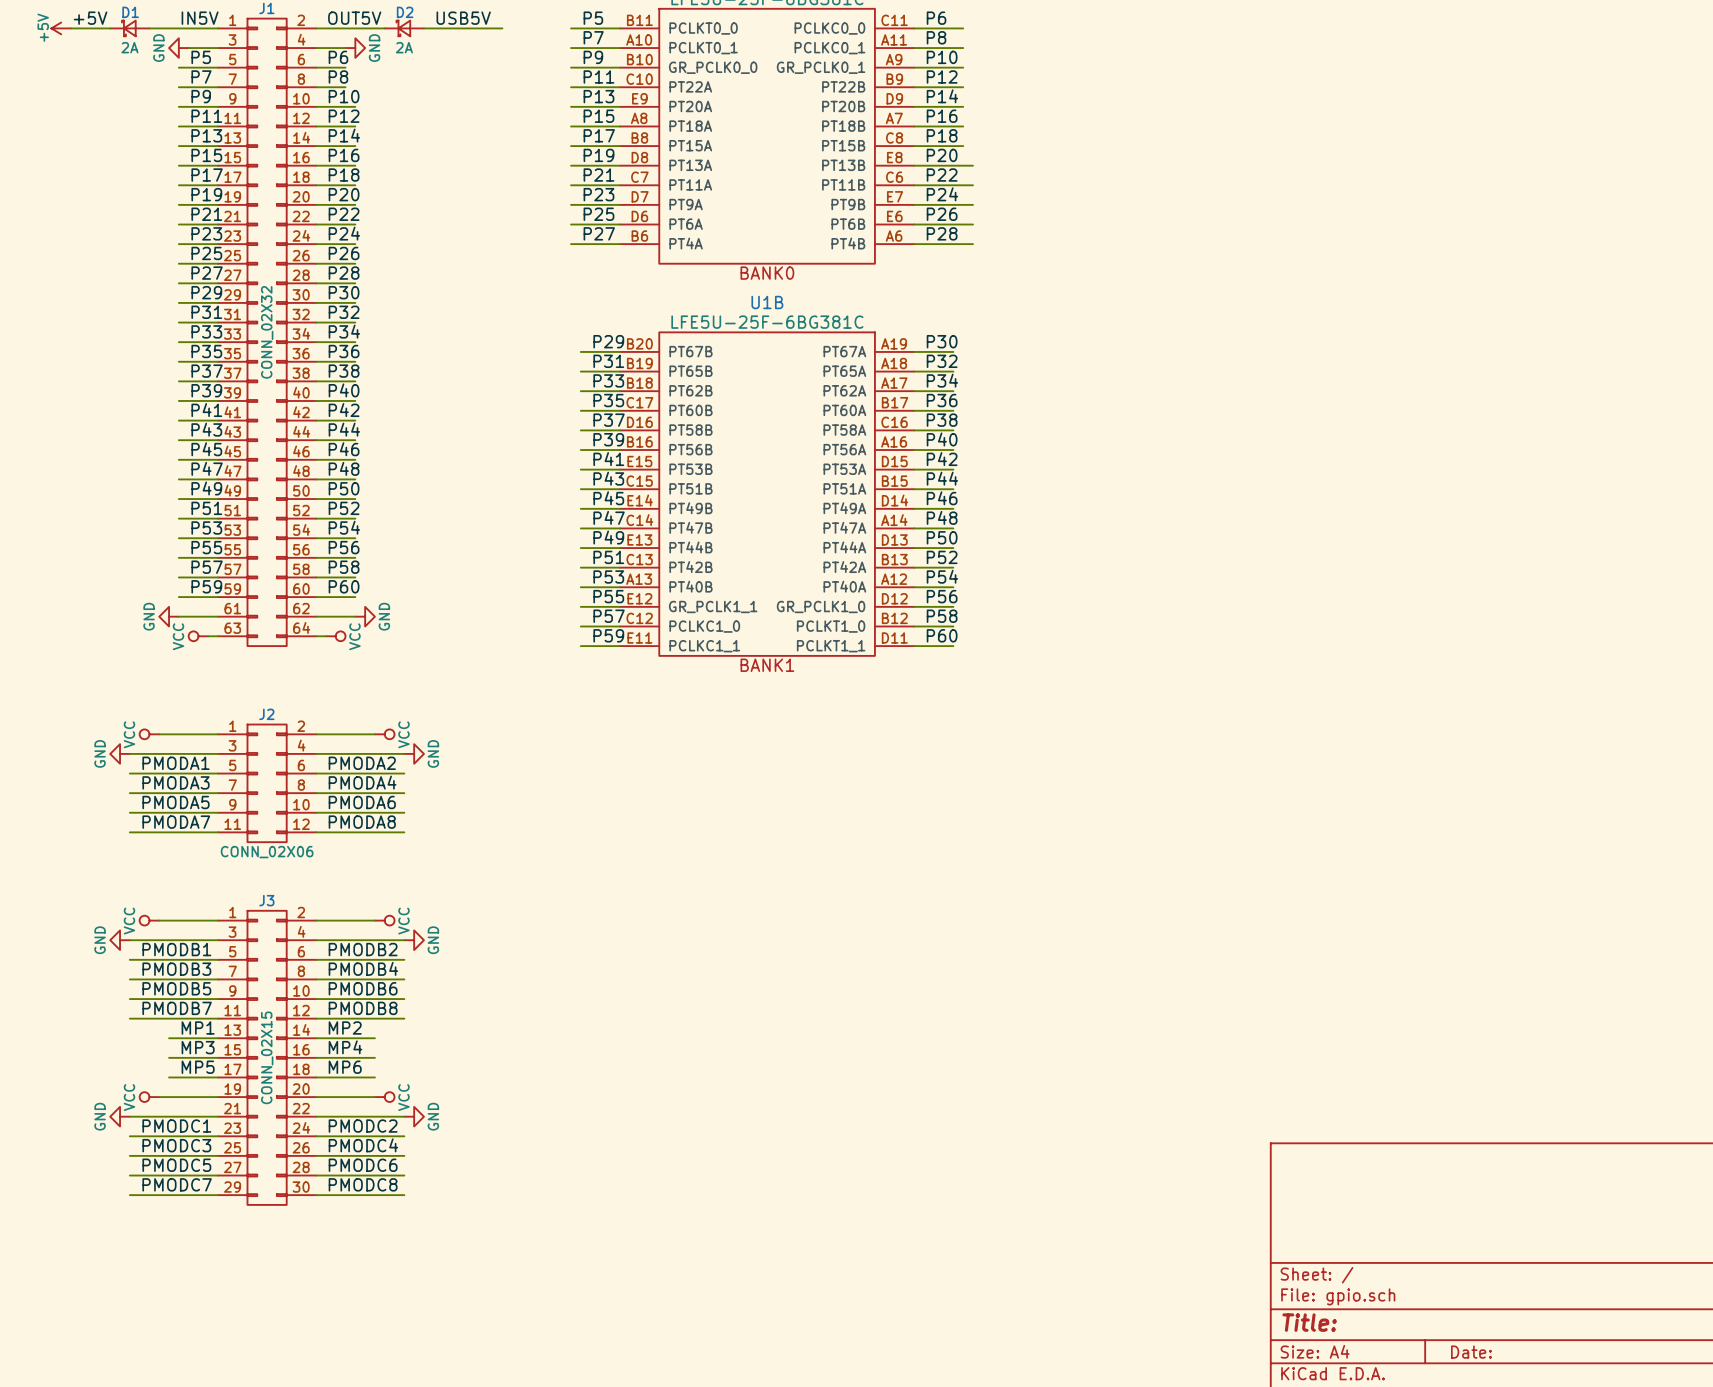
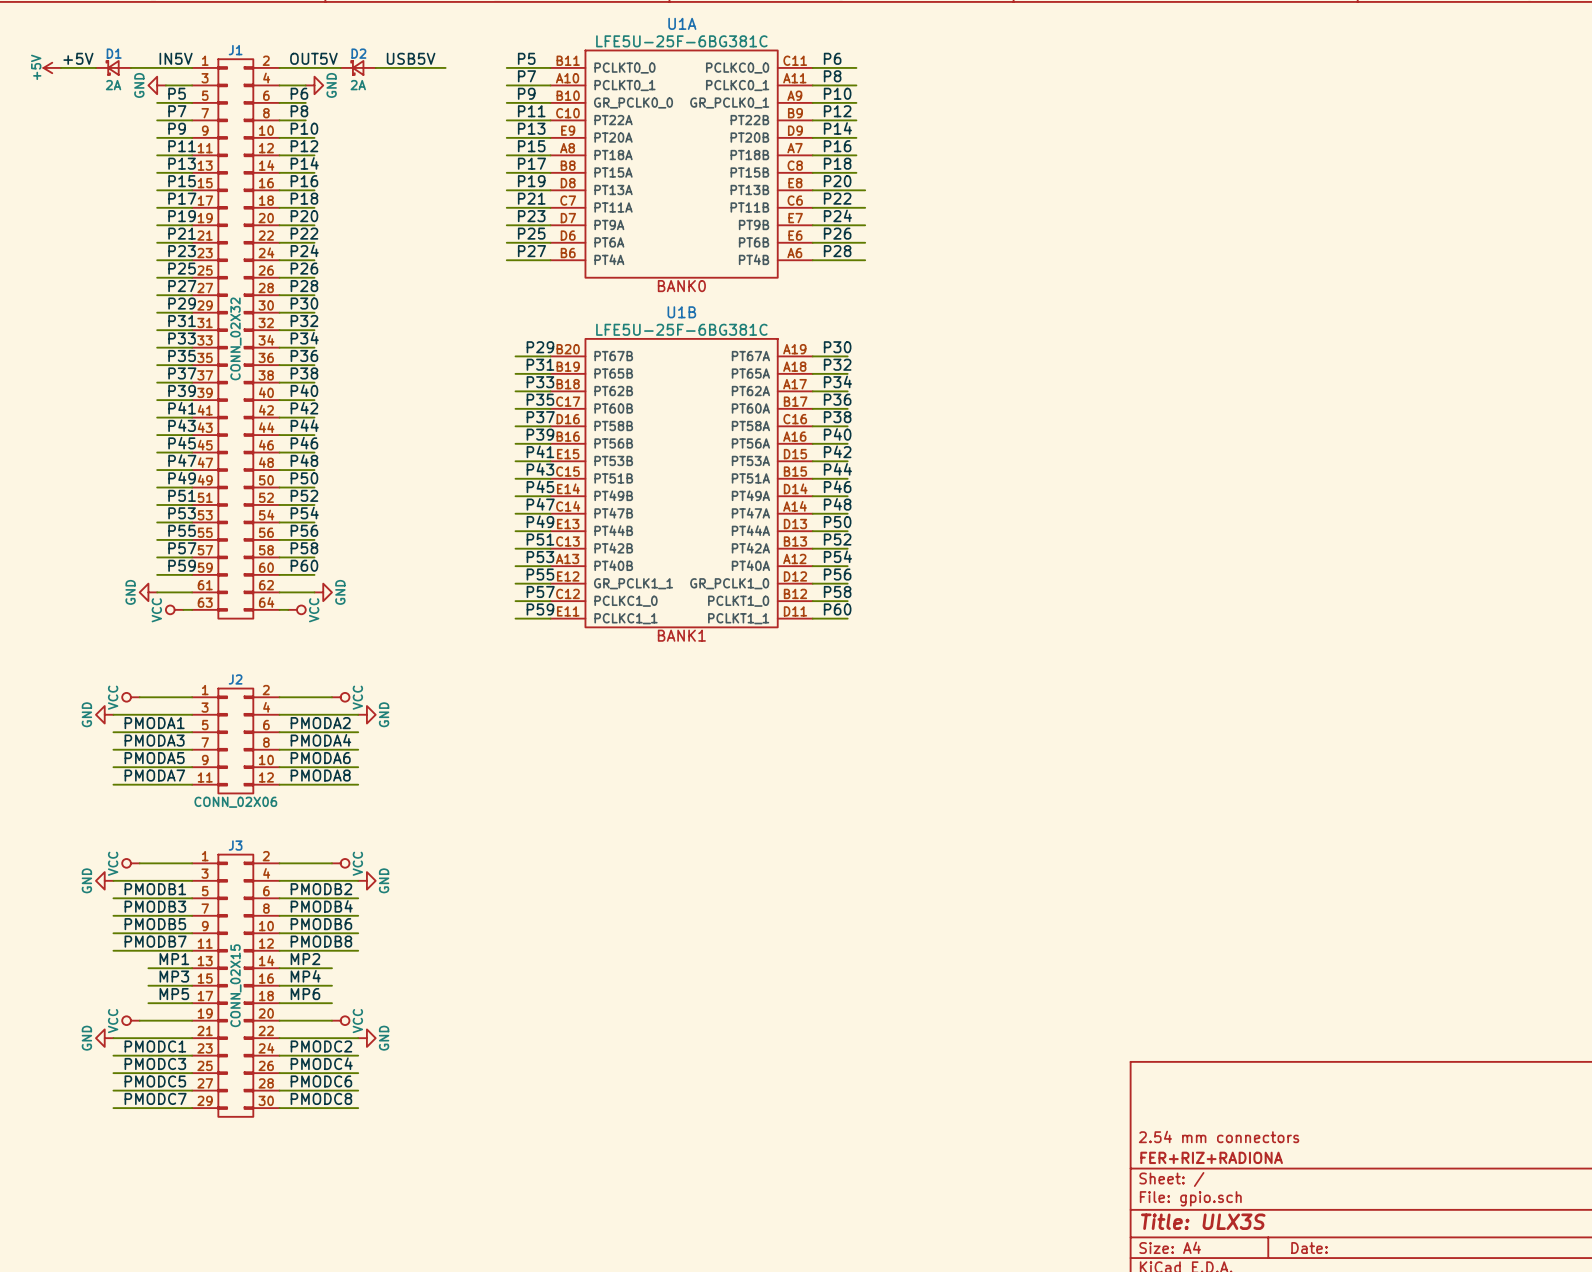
title block: none -> 2.54 mm connectors (1219, 1136)
title block: none -> FER+RIZ+RADIONA (1211, 1157)
title block: Title: (1309, 1322) -> Title: ULX3S (1203, 1221)

